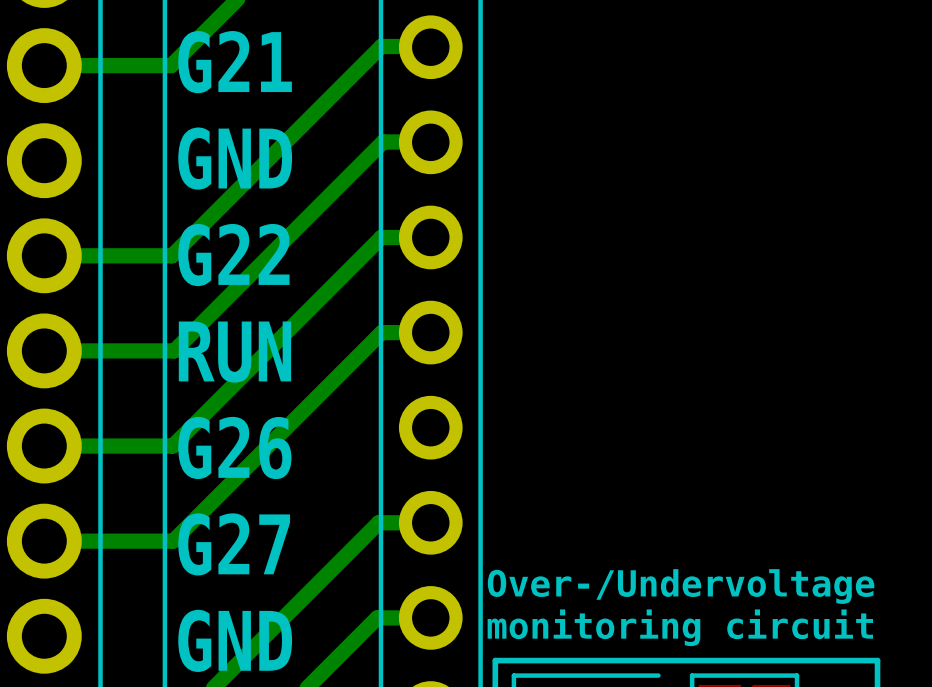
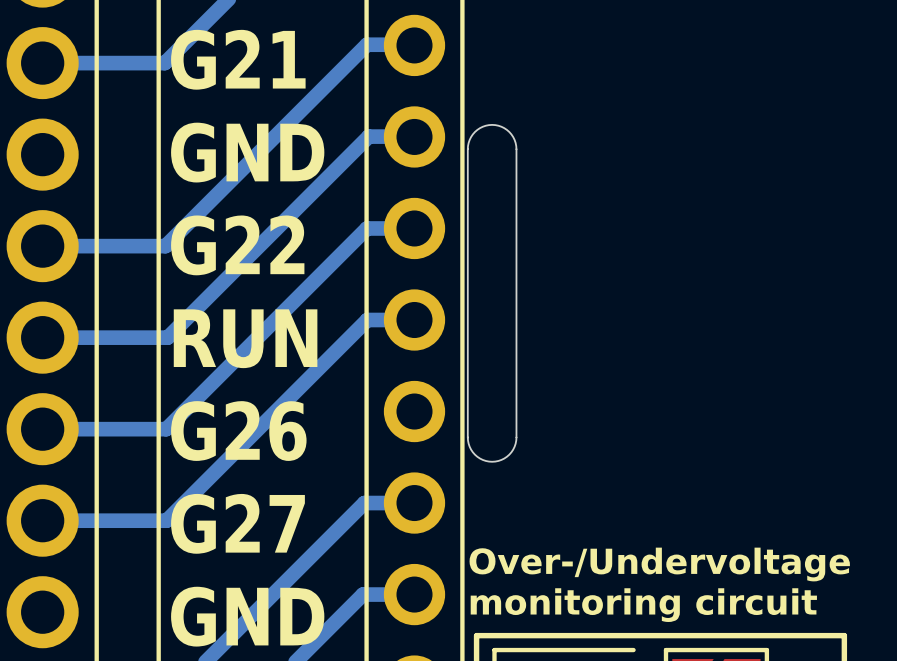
board edge: none -> (467, 149) (468, 440) (471, 449) (477, 456) (485, 460) (495, 461) (509, 454) (516, 440) (516, 146) (513, 137) (506, 129) (492, 124) (482, 126) (474, 132) (469, 139) (467, 149)

